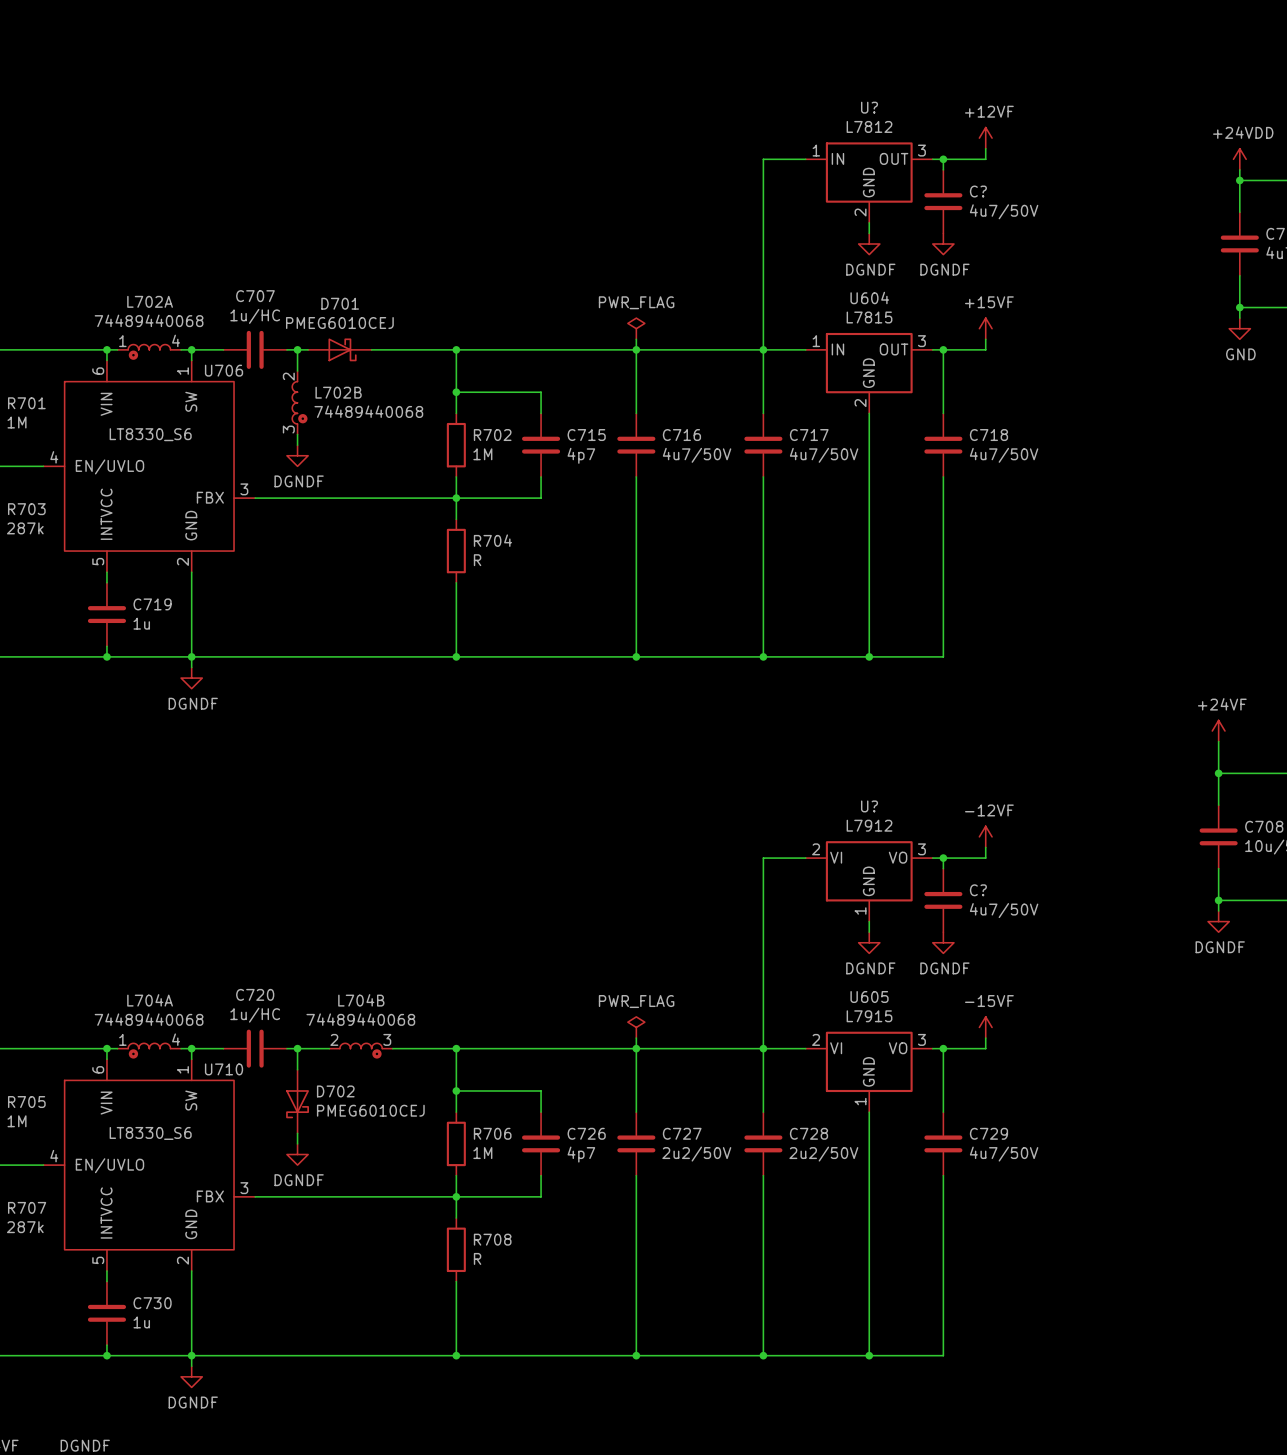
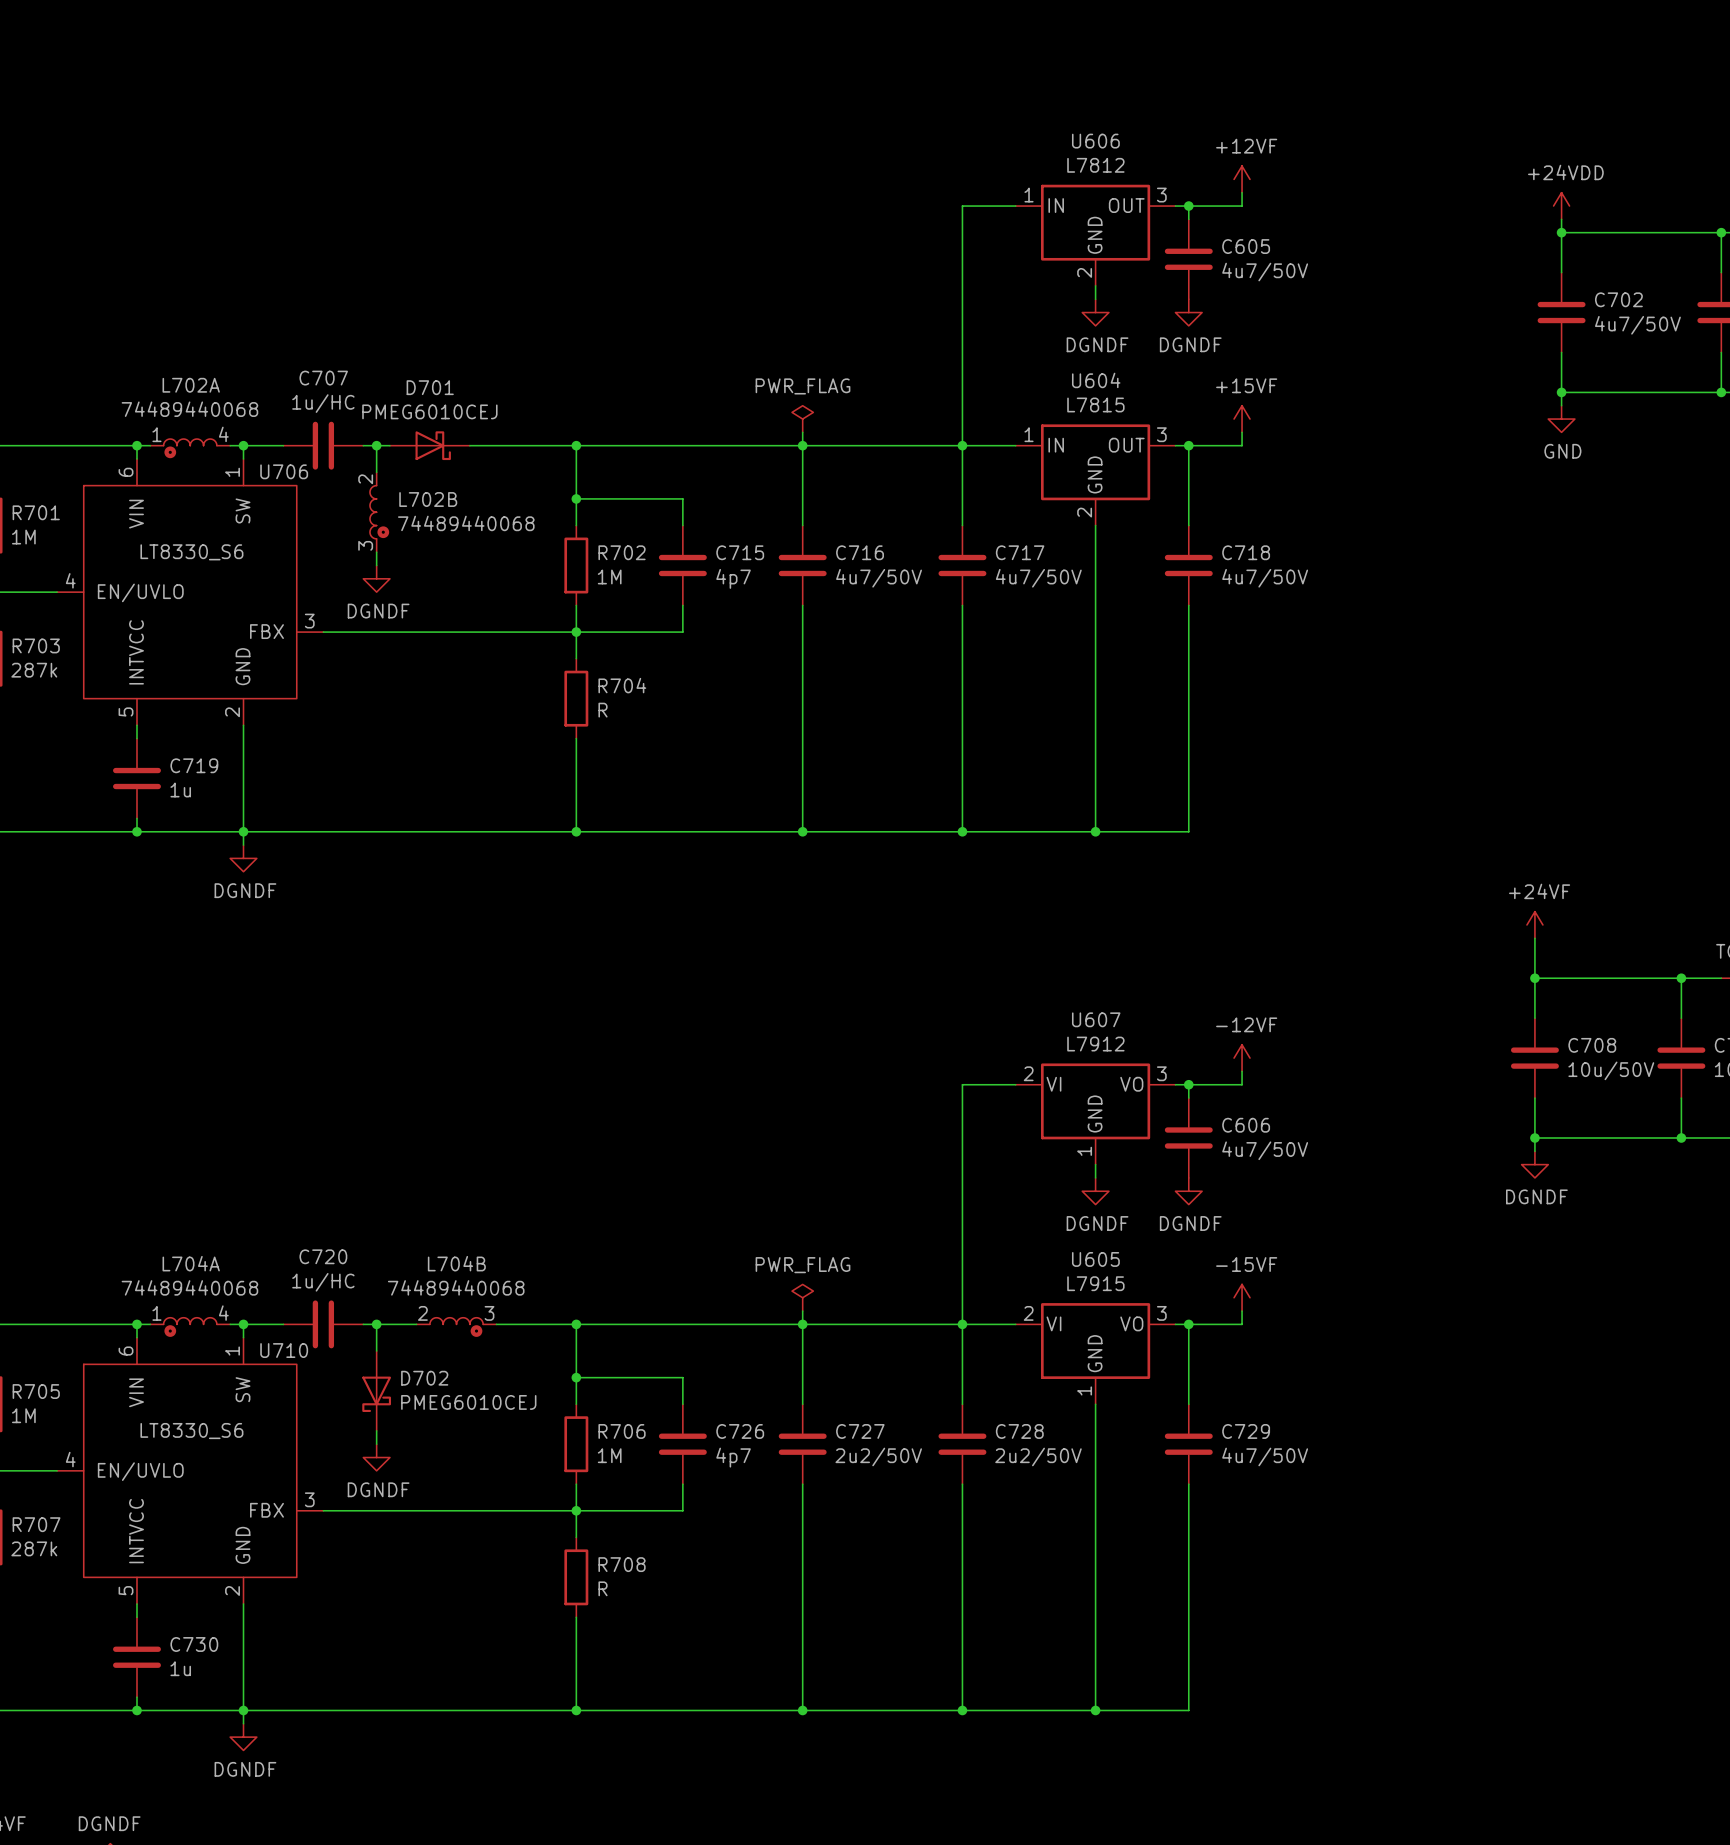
U? name: U? (869, 107) -> U606 (1095, 141)
C? name: C? (978, 191) -> C605 (1246, 246)
U? name: U? (869, 806) -> U607 (1096, 1019)
C? name: C? (978, 890) -> C606 (1246, 1125)

